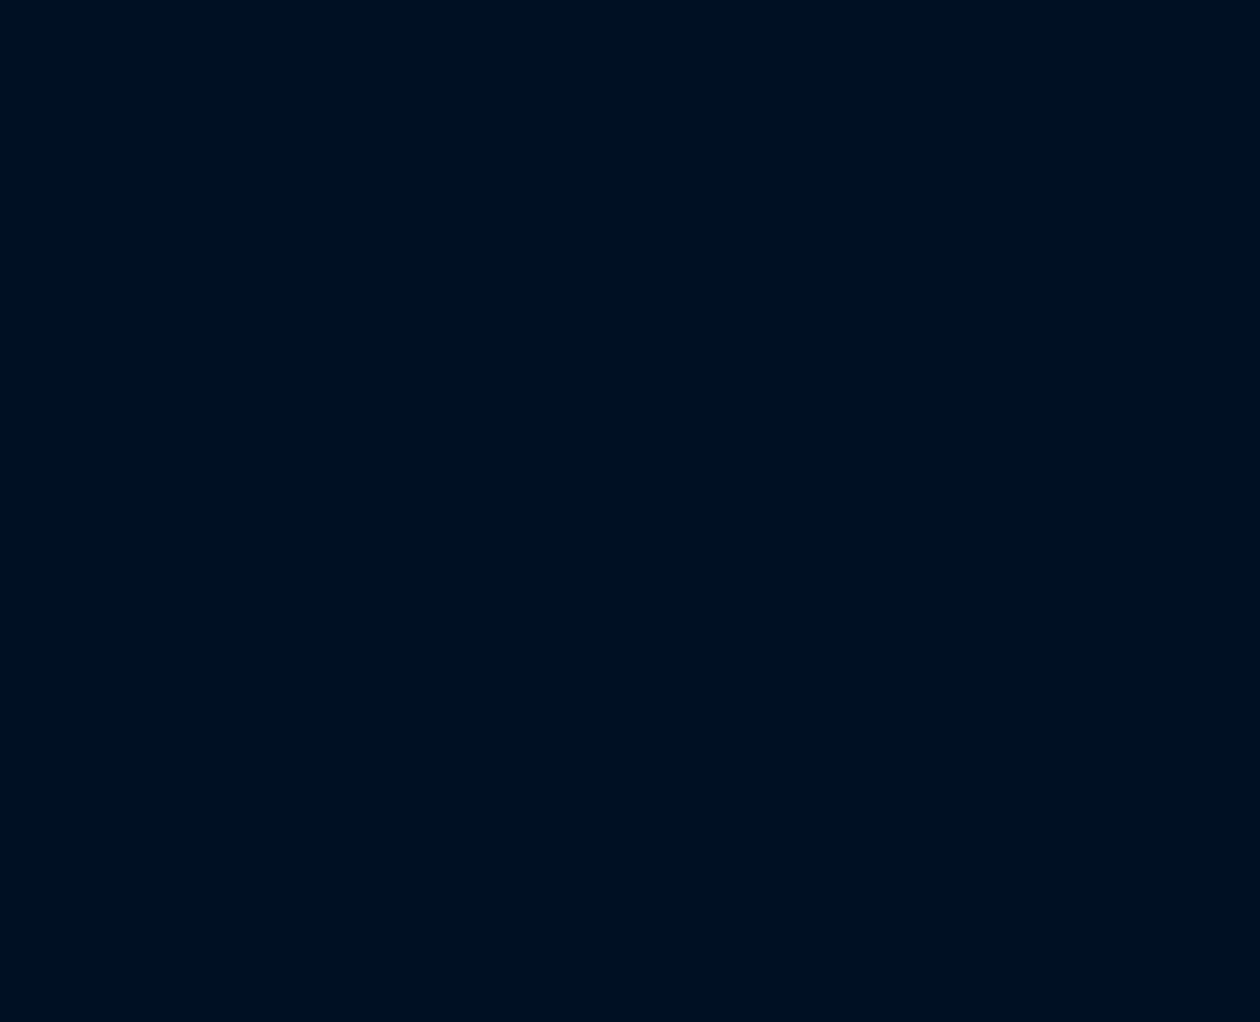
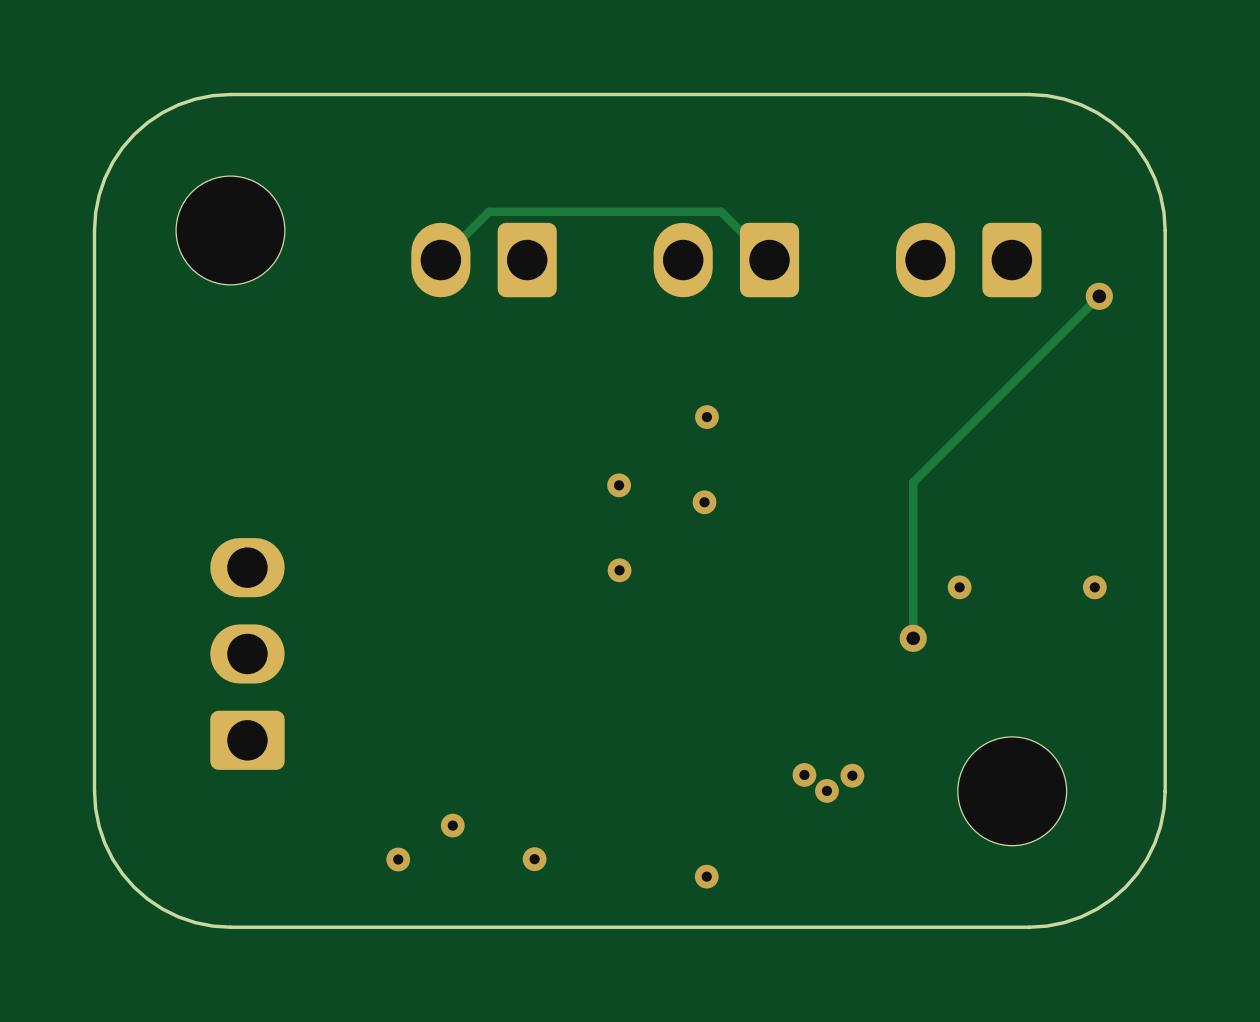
board edge: none -> (1029, 94) (230, 94) (212, 95) (178, 104) (147, 122) (122, 147) (104, 178) (95, 212) (94, 230) (94, 791) (95, 809) (104, 843) (122, 874) (134, 887) (162, 909) (195, 922) (230, 927) (1029, 927) (1064, 922) (1097, 909) (1111, 899) (1125, 887) (1146, 859) (1154, 843) (1164, 809) (1164, 212) (1160, 195) (1146, 162) (1137, 147) (1111, 122) (1097, 112) (1064, 99) (1029, 94)
part: none -> (230, 230)
part: none -> (484, 260)
part: none -> (726, 260)
track: none -> (769, 260) (721, 211) (489, 211) (440, 260)
part: none -> (968, 260)
track: none -> (1099, 296) (913, 482) (913, 638)
via: none -> (1099, 296)
via: none -> (706, 417)
via: none -> (619, 485)
via: none -> (704, 502)
via: none -> (619, 570)
via: none -> (959, 587)
via: none -> (1094, 587)
via: none -> (913, 638)
part: none -> (247, 653)
via: none -> (804, 774)
via: none -> (852, 775)
via: none -> (826, 790)
part: none -> (1012, 791)
via: none -> (452, 825)
via: none -> (398, 859)
via: none -> (534, 859)
via: none -> (706, 876)

